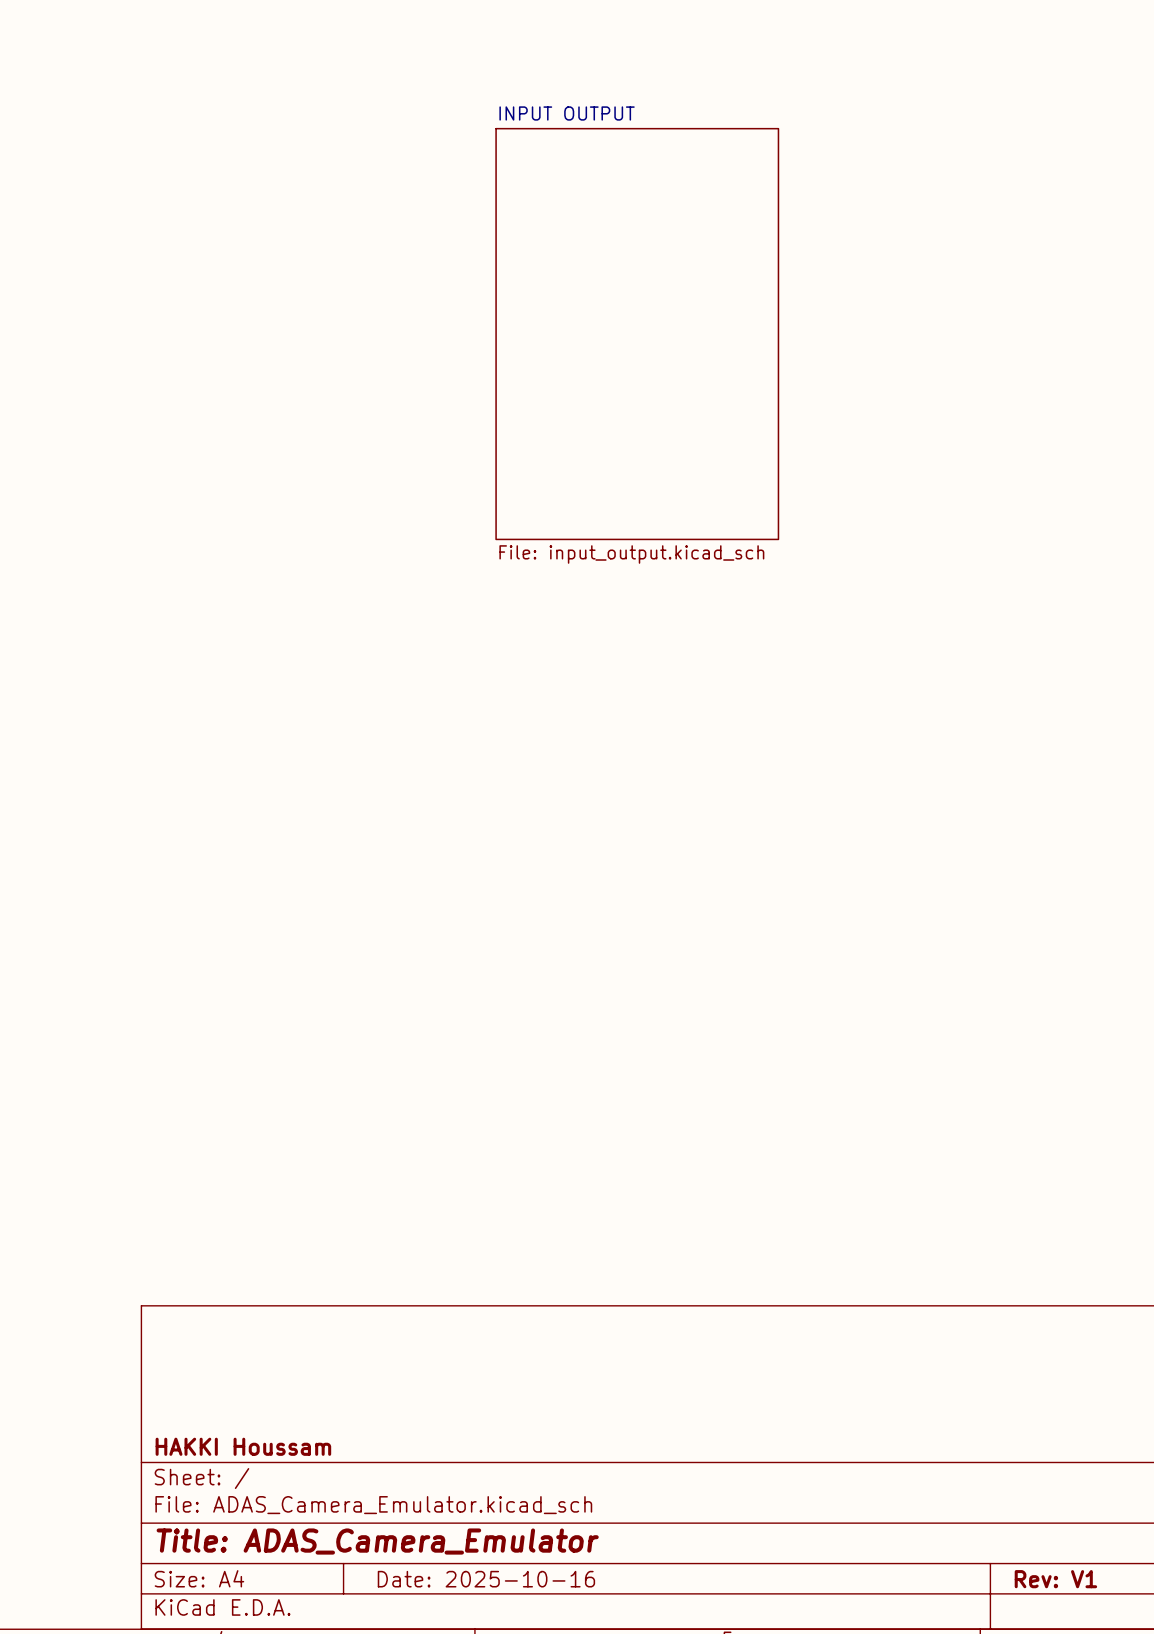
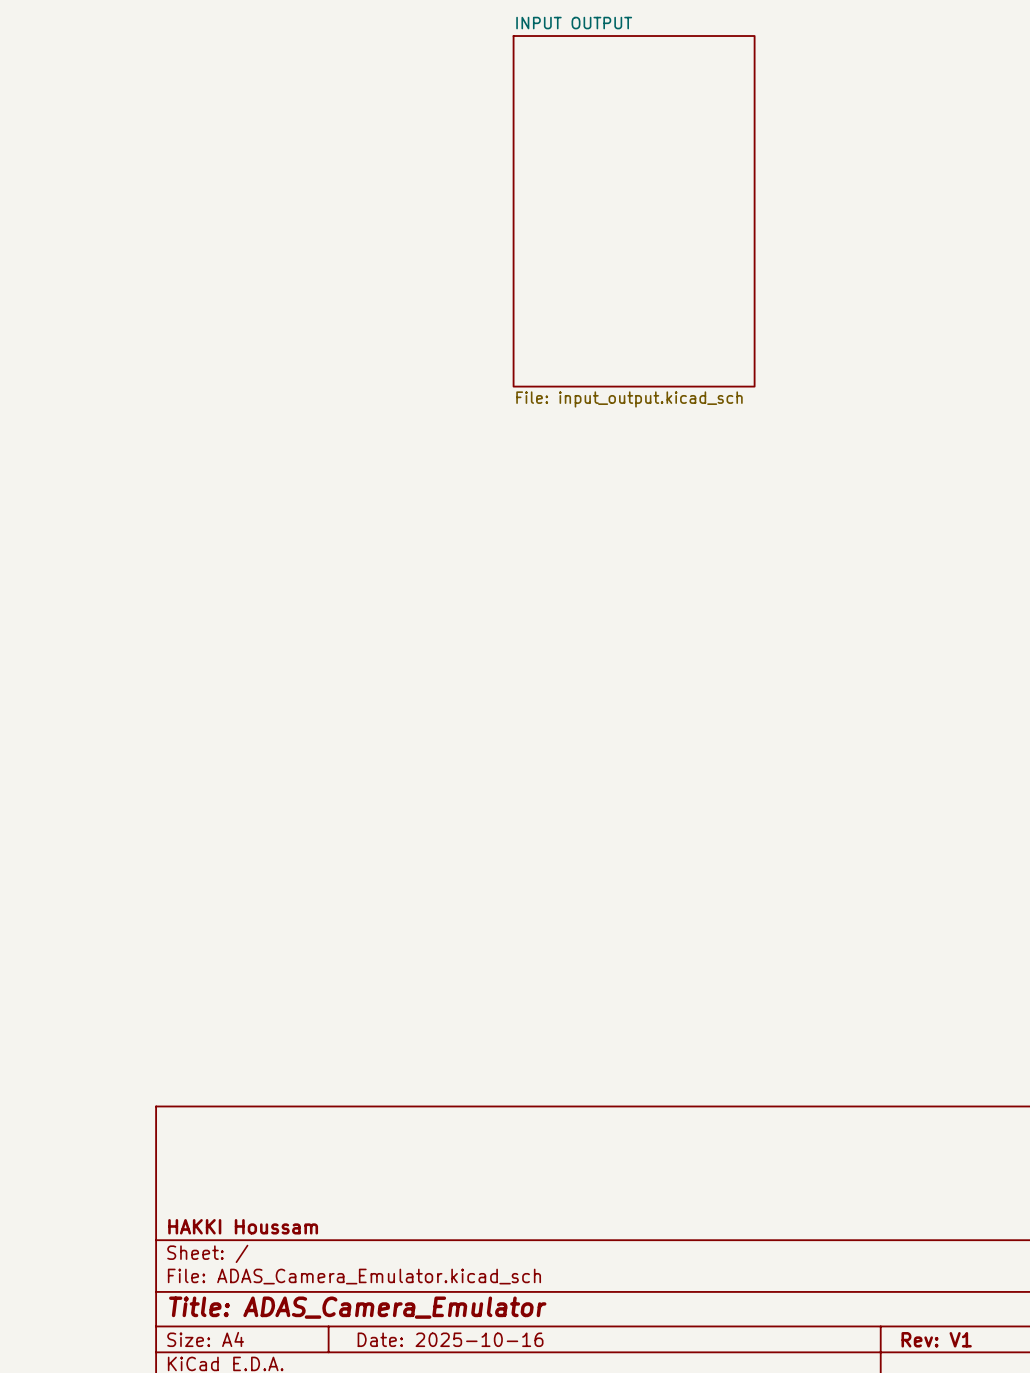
sheet INPUT OUTPUT position: (637, 334) -> (634, 211)

